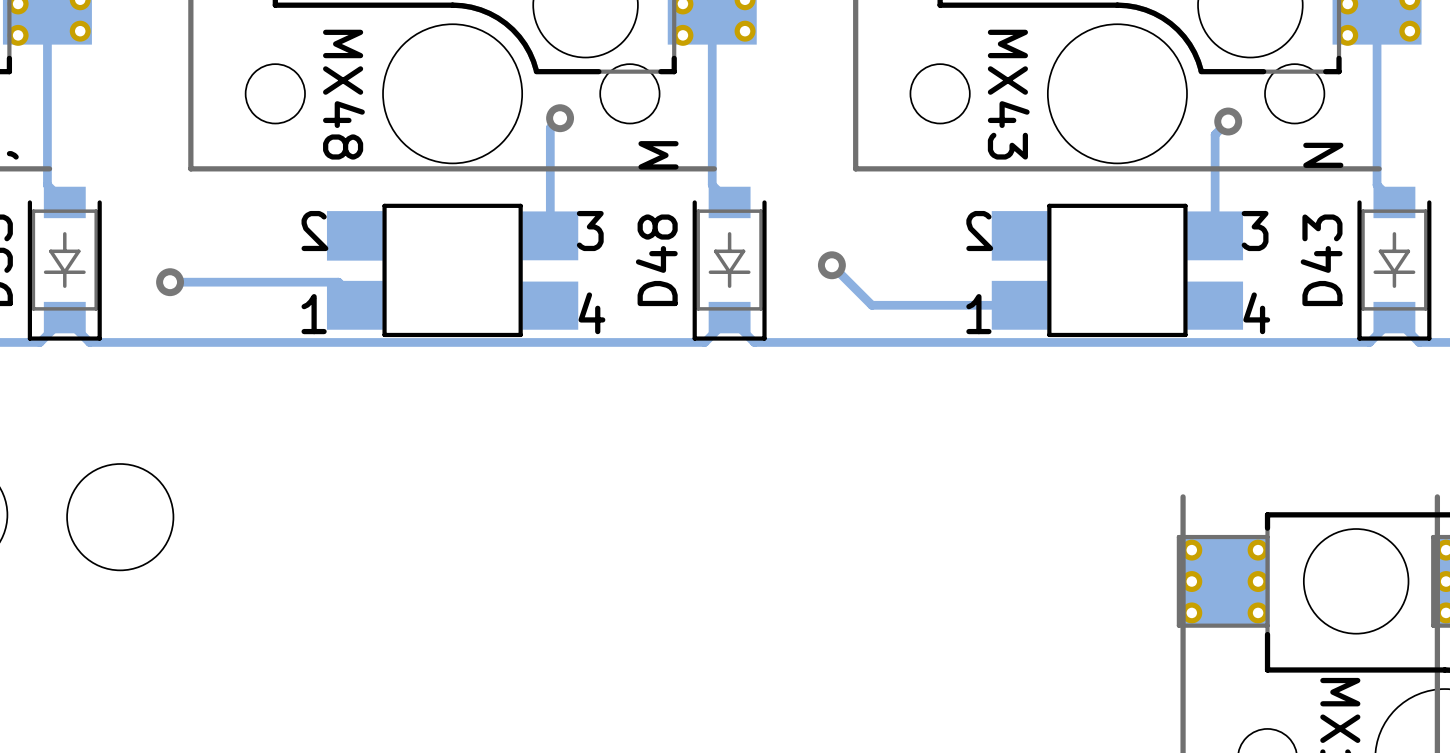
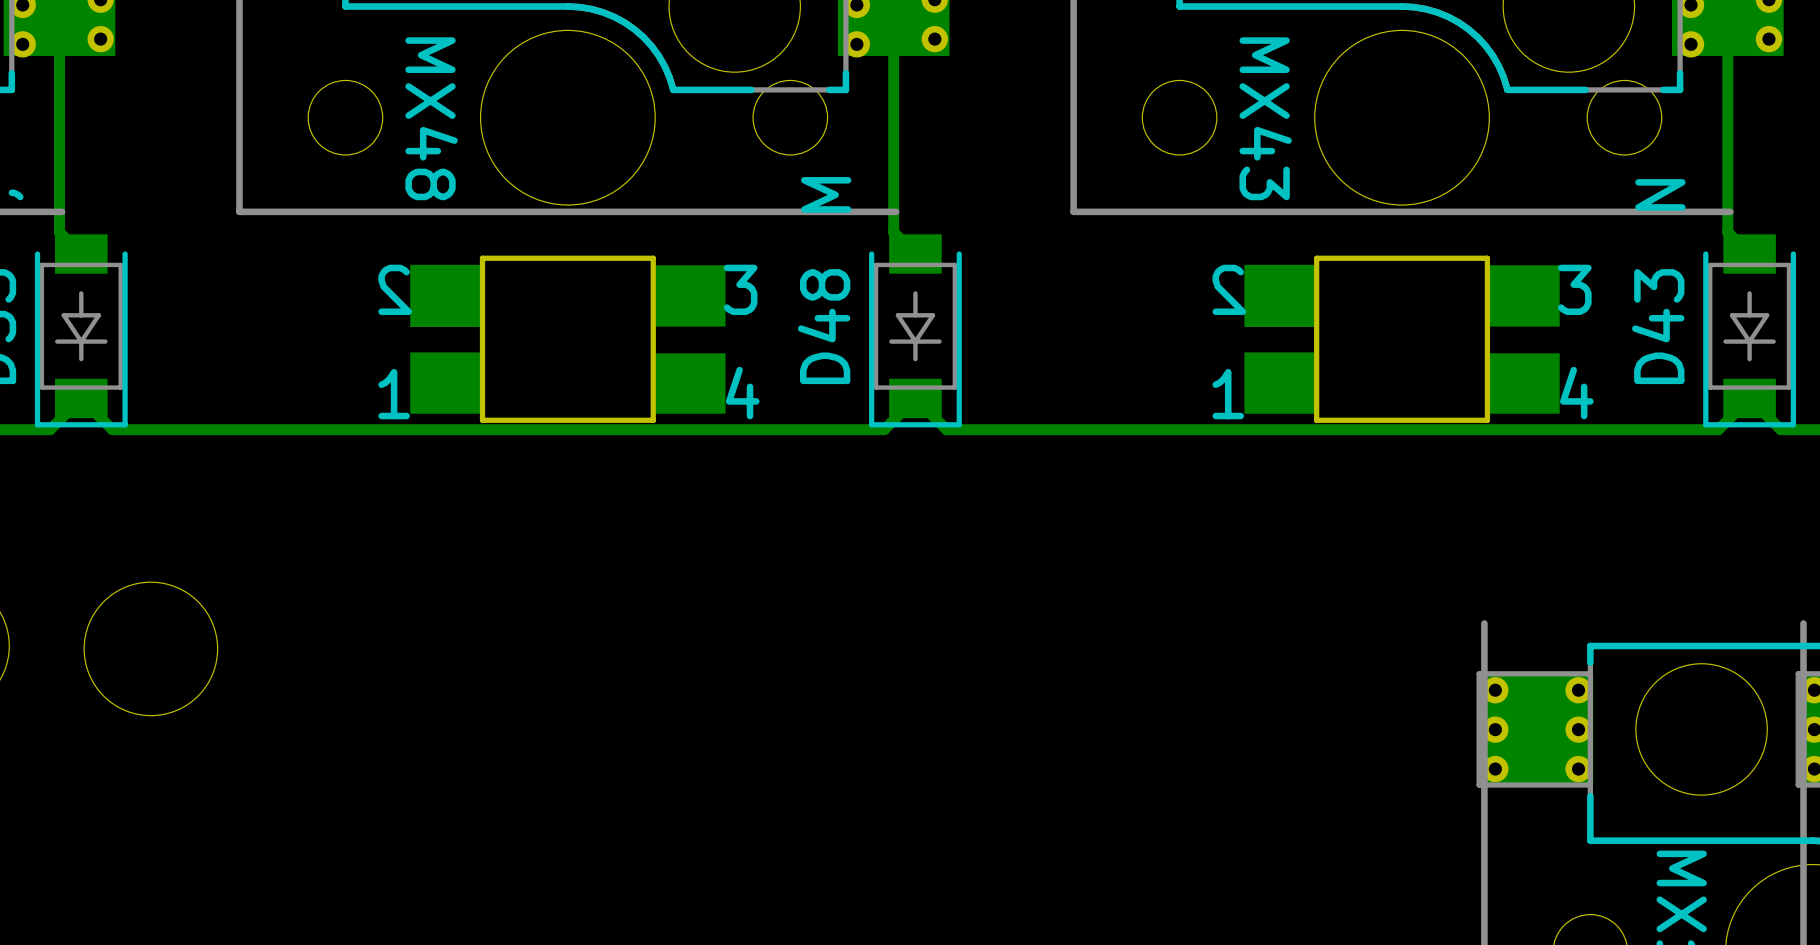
track: (560, 118) (550, 127) (550, 235) -> none
via: (560, 118) -> none
track: (1228, 121) (1215, 134) (1215, 235) -> none
via: (1228, 121) -> none
track: (831, 265) (871, 305) (1019, 305) -> none
via: (831, 265) -> none
track: (170, 282) (338, 282) (356, 299) (354, 305) -> none
via: (170, 282) -> none

